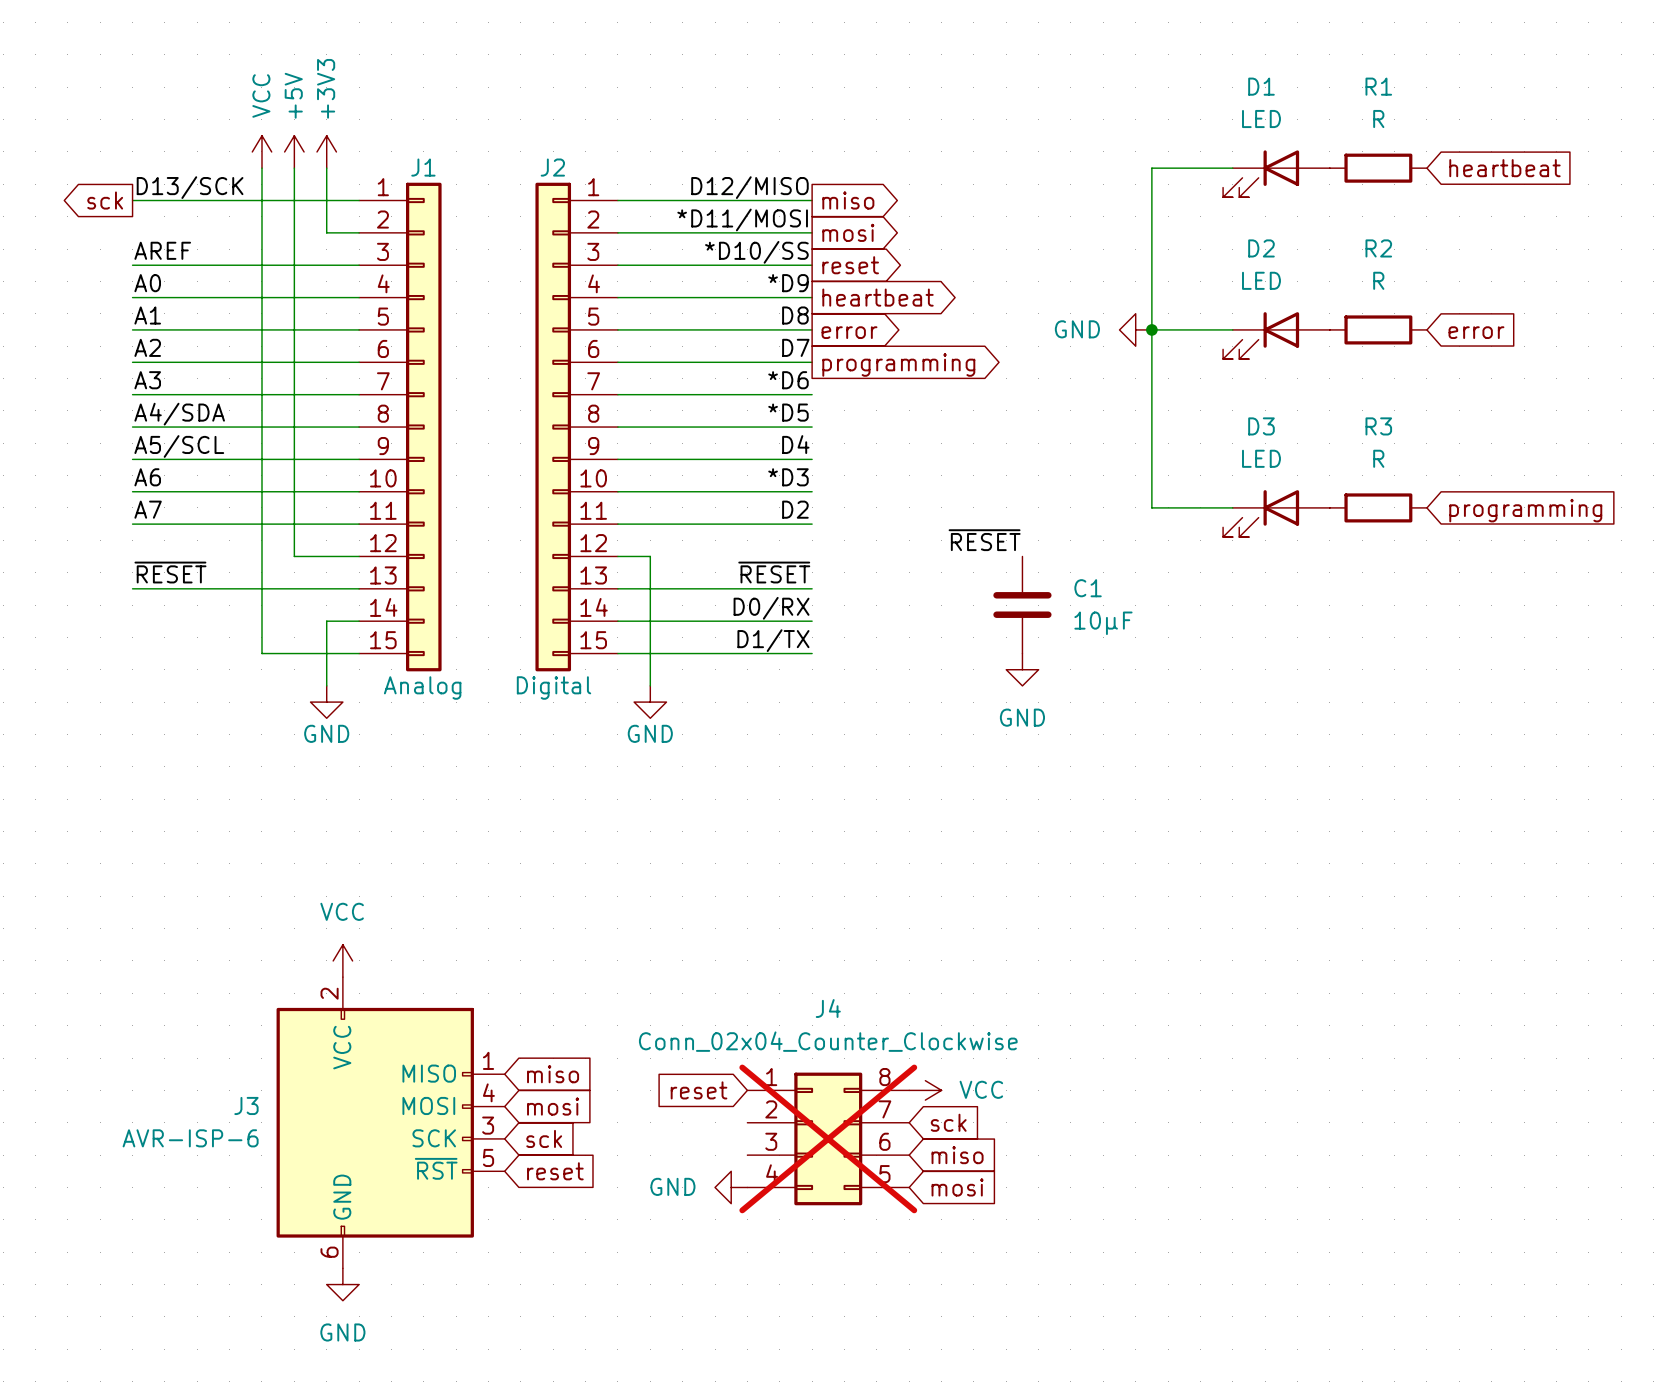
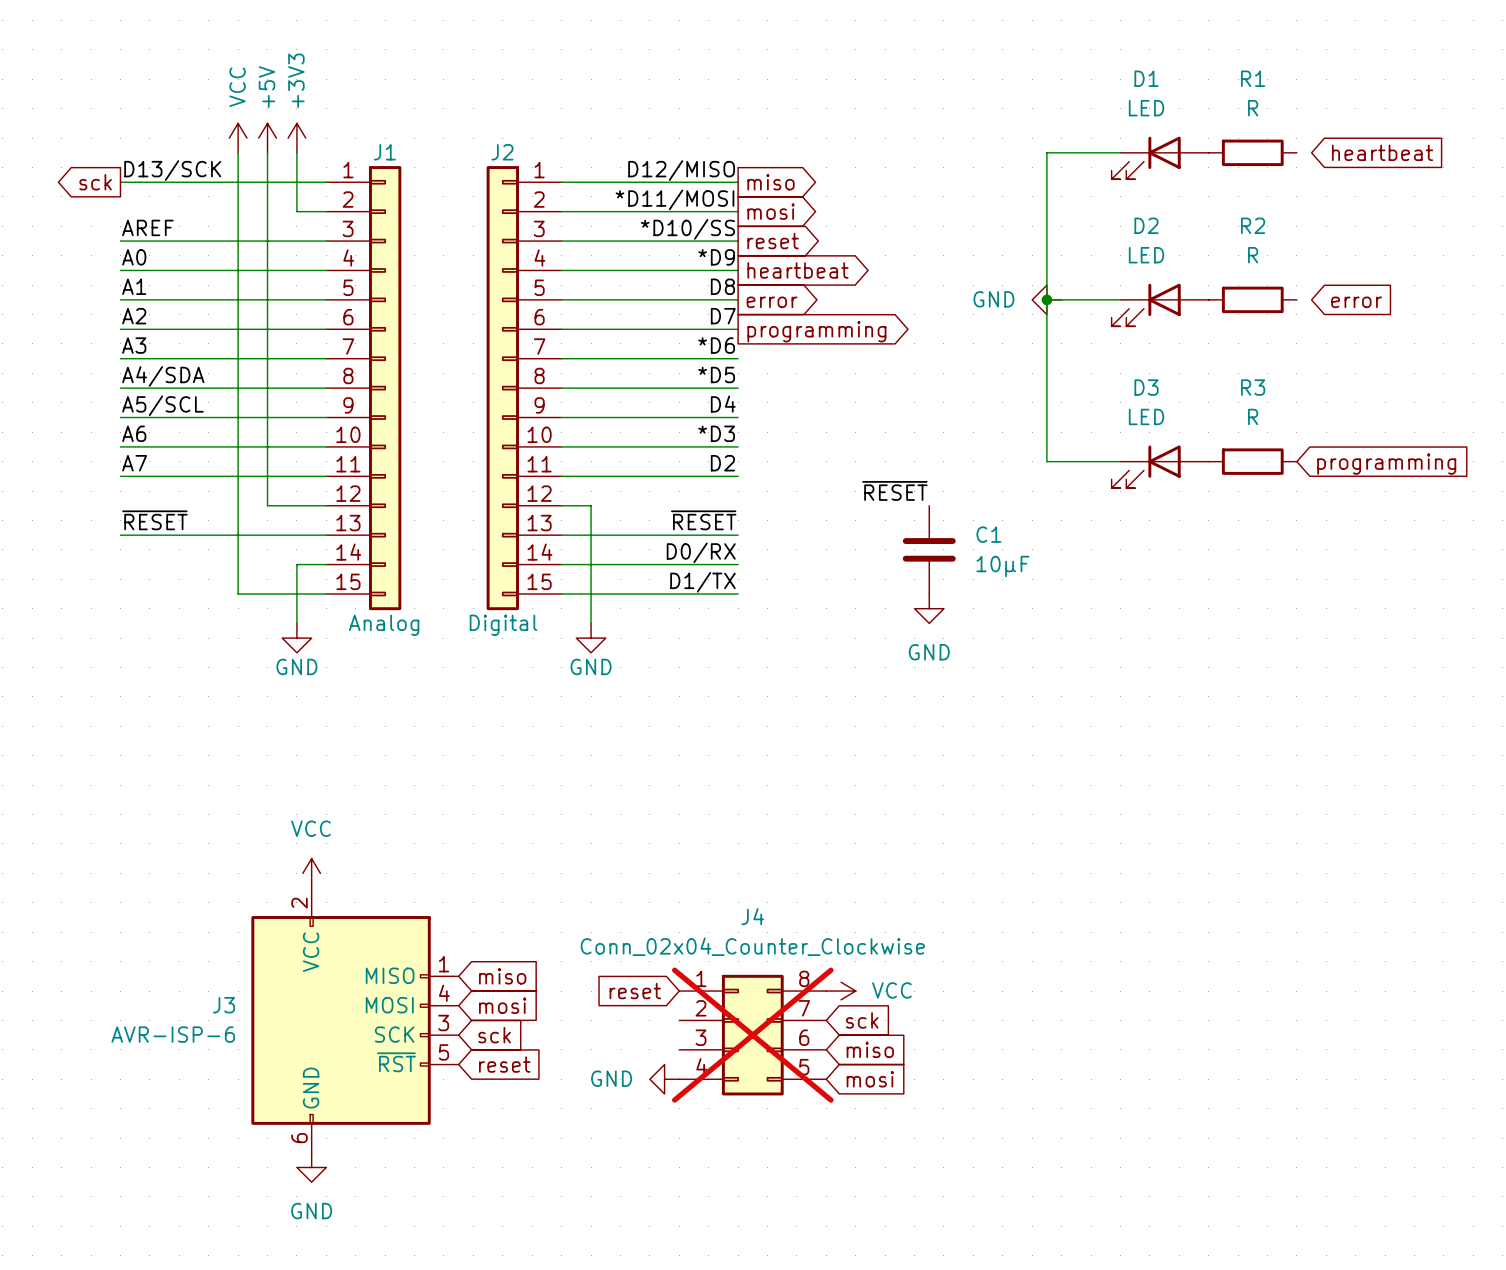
global label position: heartbeat (1504, 168) -> heartbeat (1382, 152)
power symbol position: GND (1135, 329) -> GND (1046, 299)
global label position: error (1476, 332) -> error (1356, 302)

